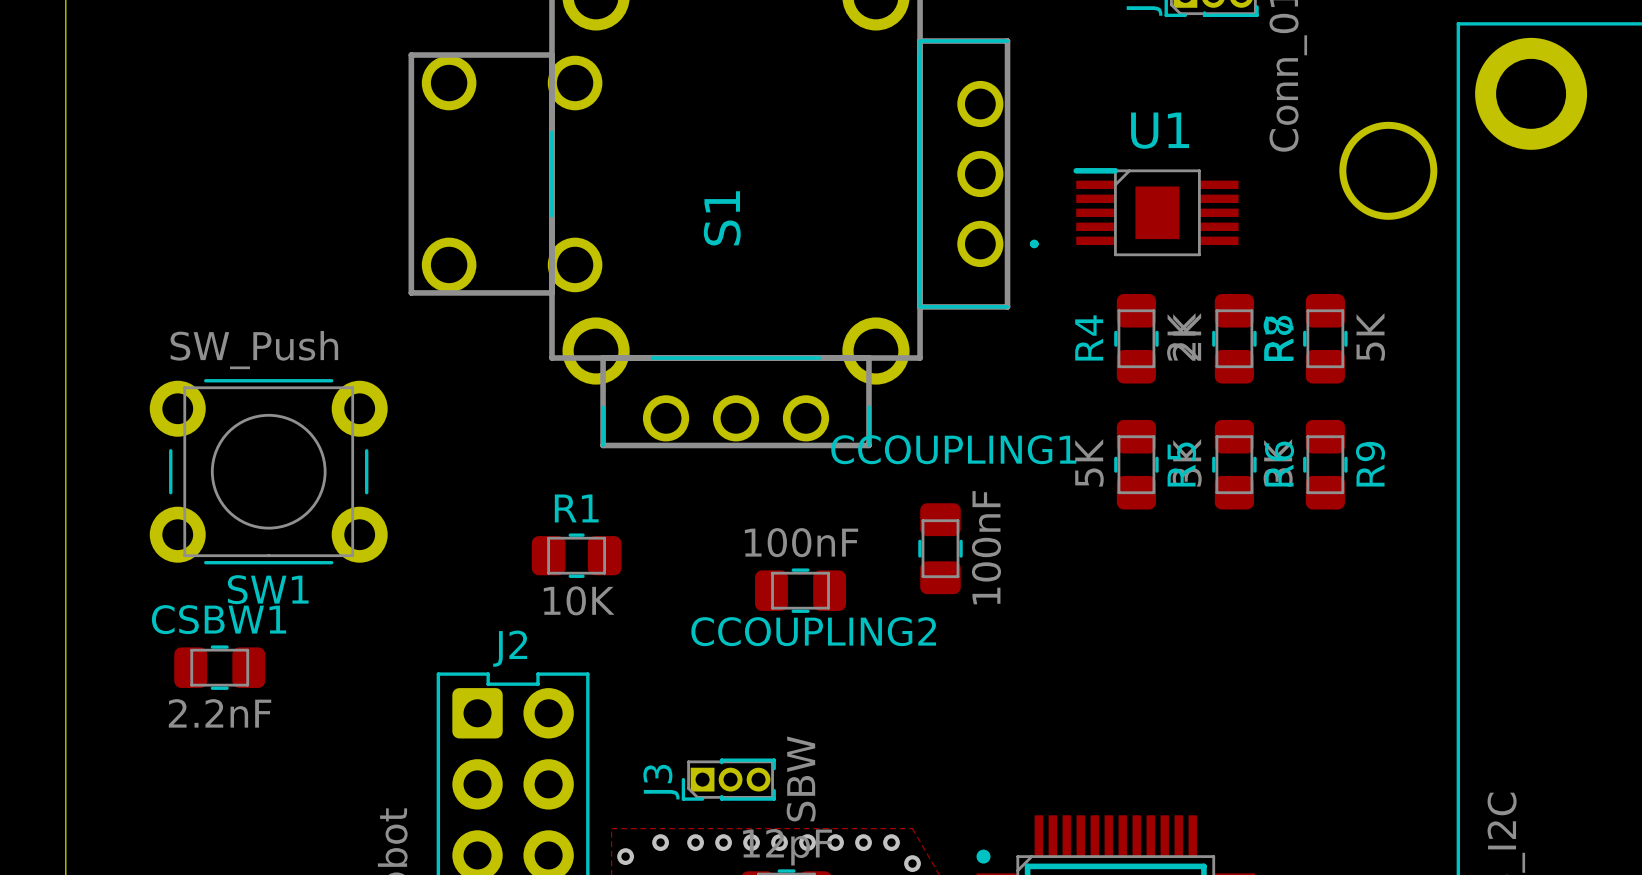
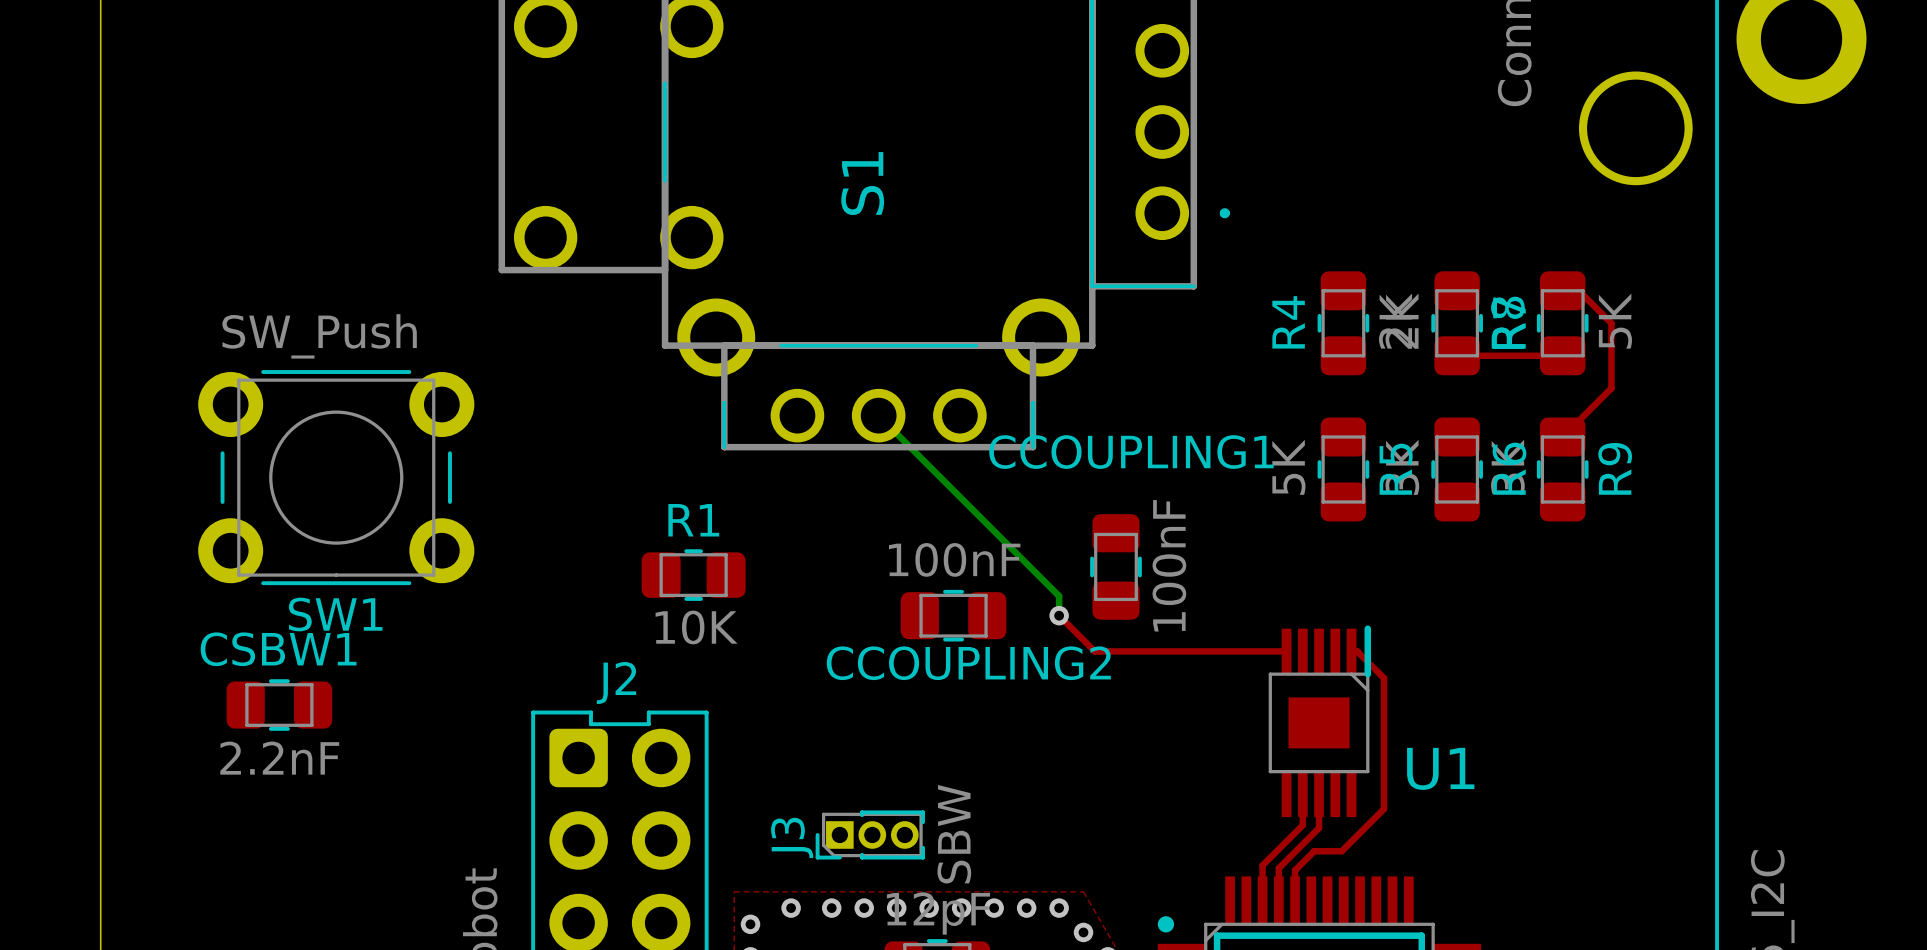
U1 rotation: 0° (1156, 212) -> 90° clockwise (1319, 721)
U1 position: (1156, 212) -> (1319, 721)
top track: none -> (1562, 290) (1578, 290) (1611, 323) (1611, 388) (1562, 436)
top track: none -> (1457, 355) (1562, 355)
bottom track: none -> (878, 415) (1059, 596) (1059, 615)
top track: none -> (1059, 615) (1094, 651) (1286, 651)
via: none -> (1059, 615)
top track: none -> (1351, 651) (1357, 651) (1384, 678) (1384, 808) (1341, 851) (1314, 851) (1295, 870) (1295, 900)
top track: none -> (1302, 794) (1302, 825) (1262, 865) (1262, 900)
top track: none -> (1319, 794) (1319, 828) (1278, 868) (1278, 900)

